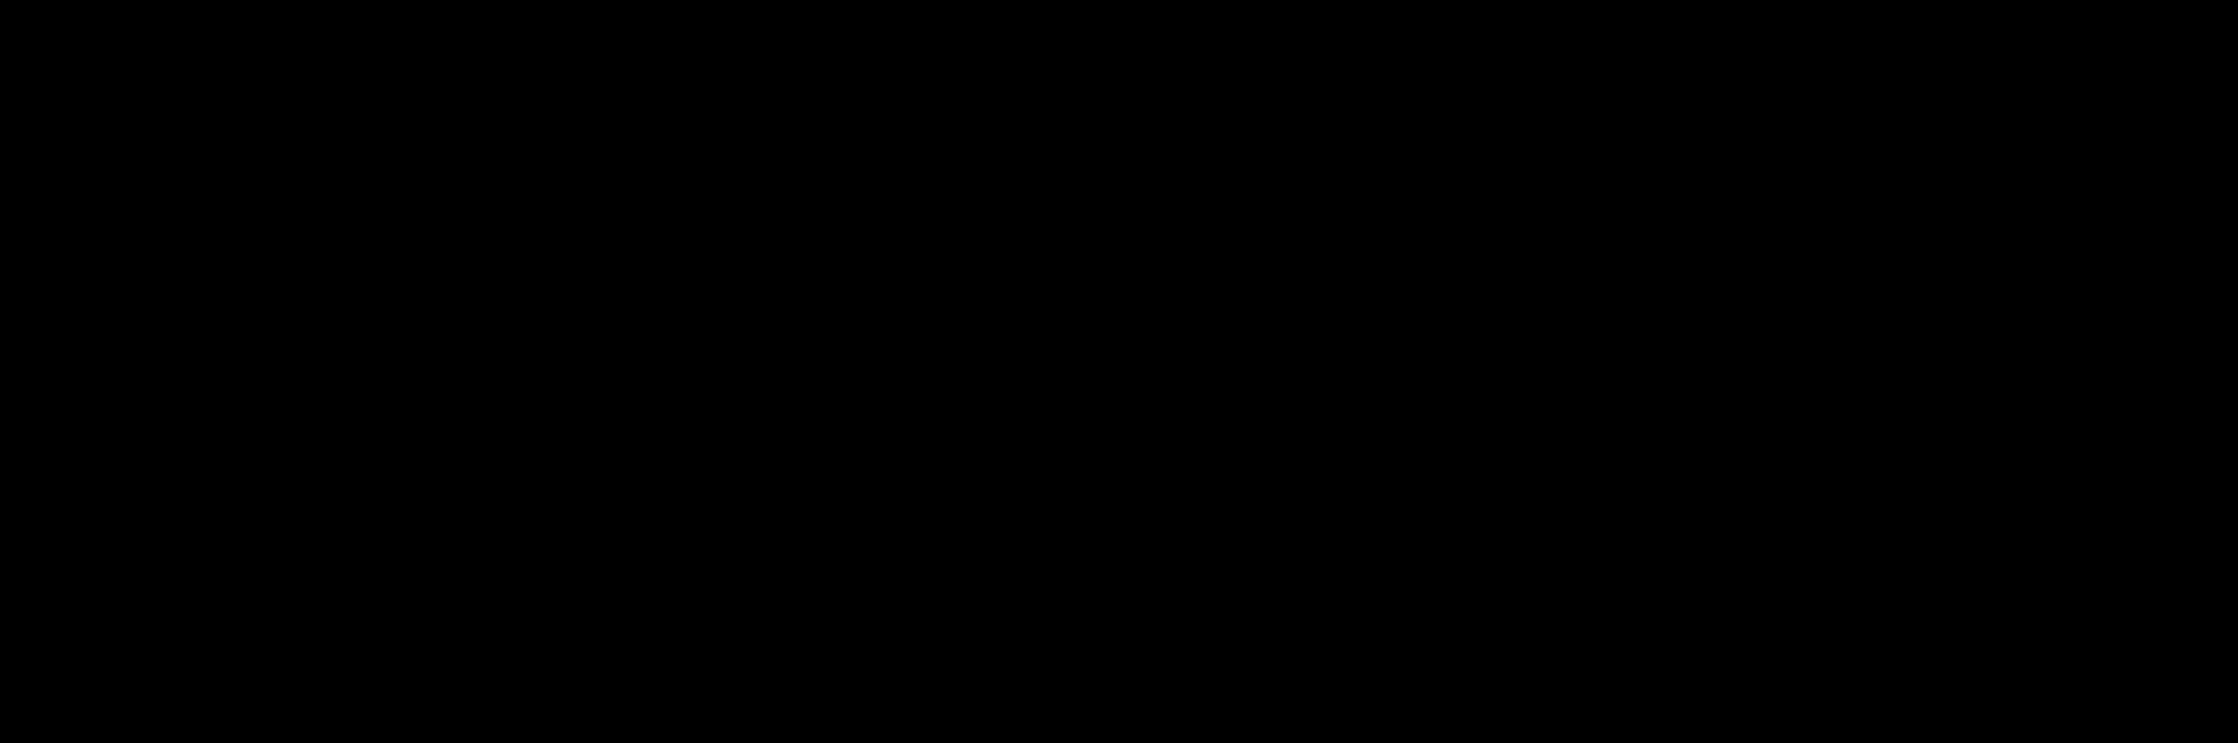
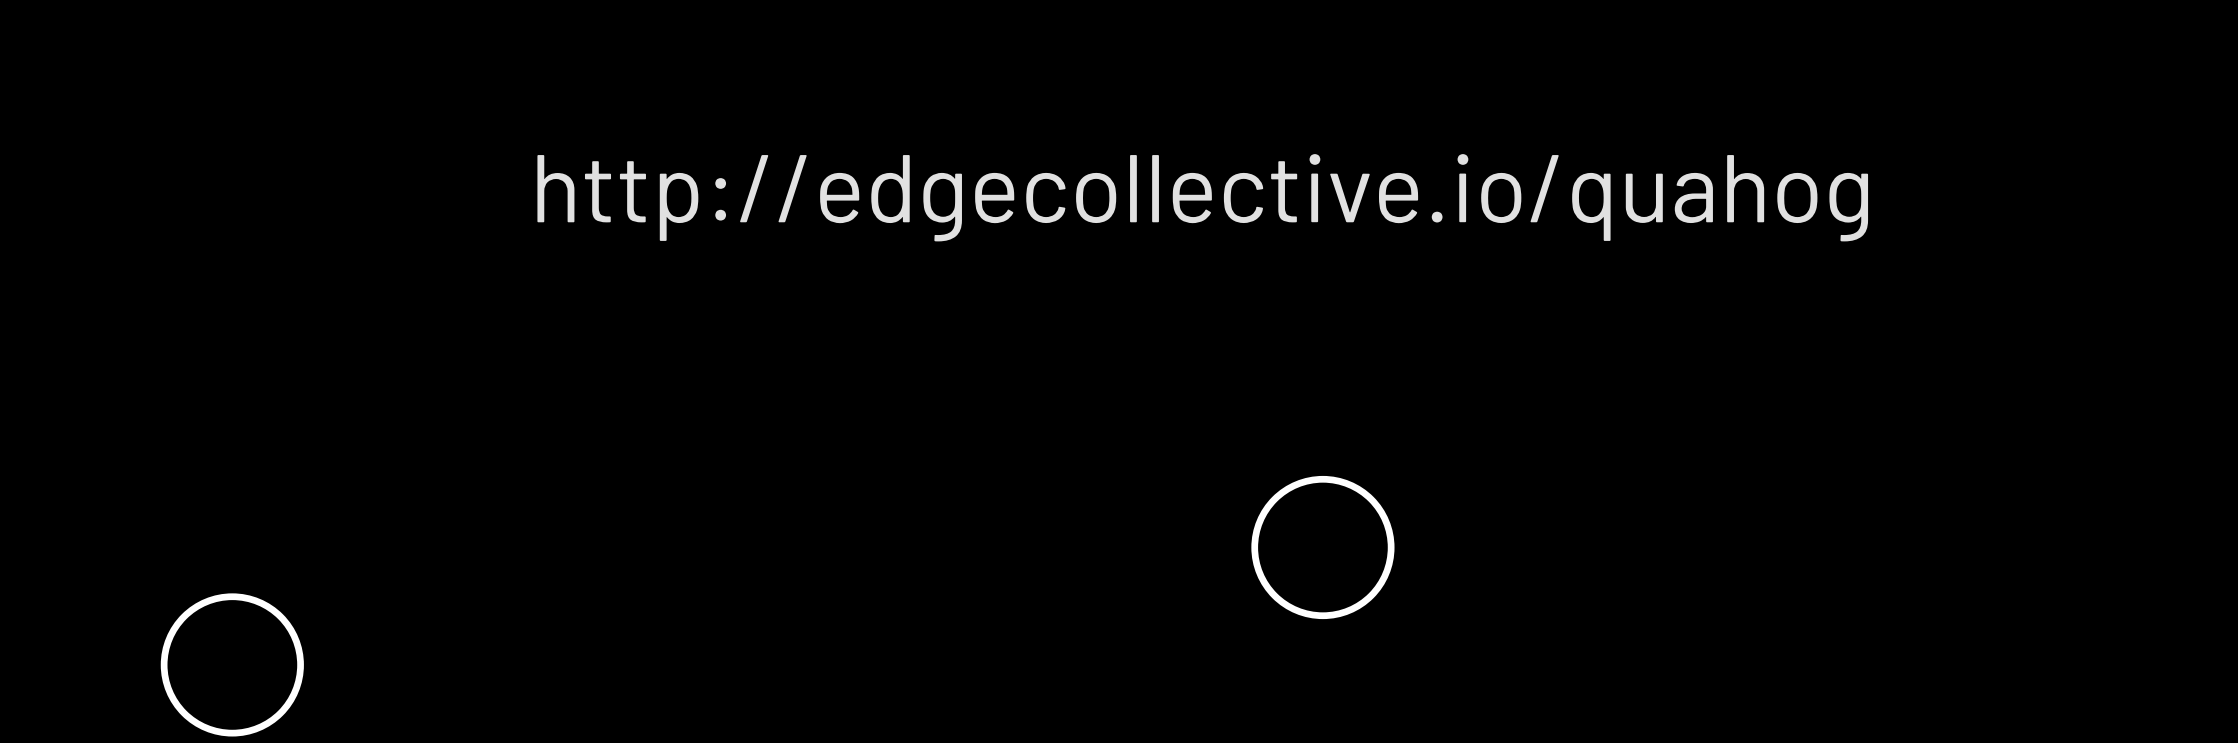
text: none -> http://edgecollective.io/quahog (1202, 197)
round board edge: none -> [1251, 475, 1395, 620]
round board edge: none -> [160, 593, 304, 737]

